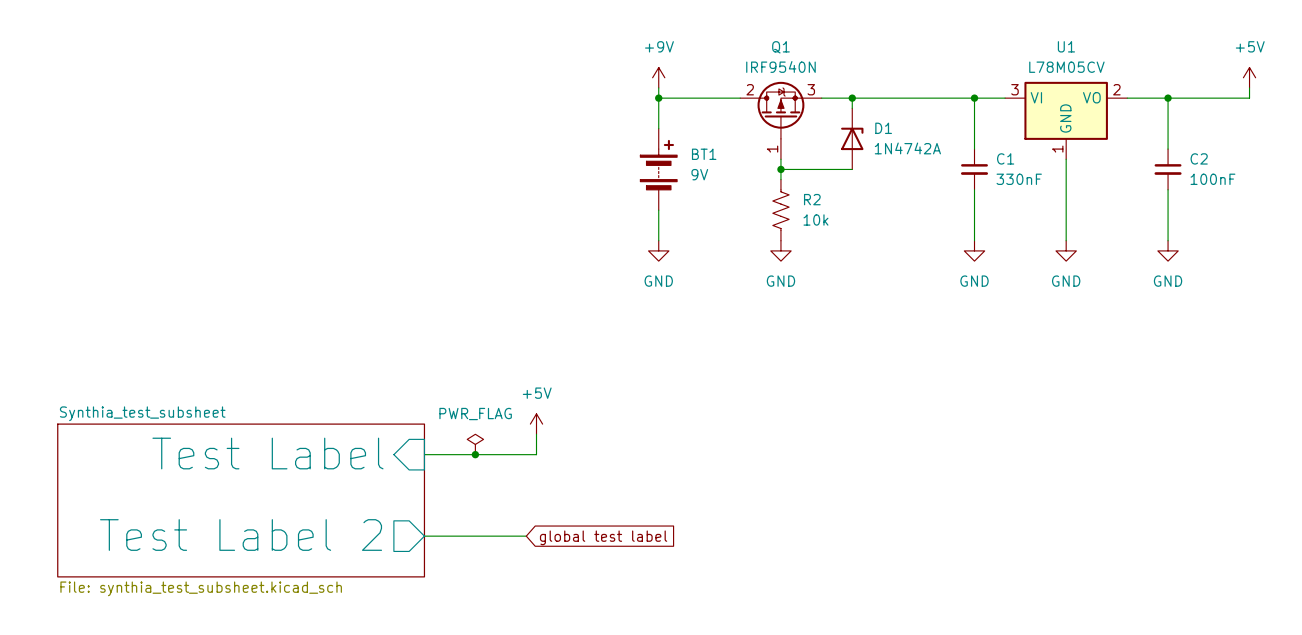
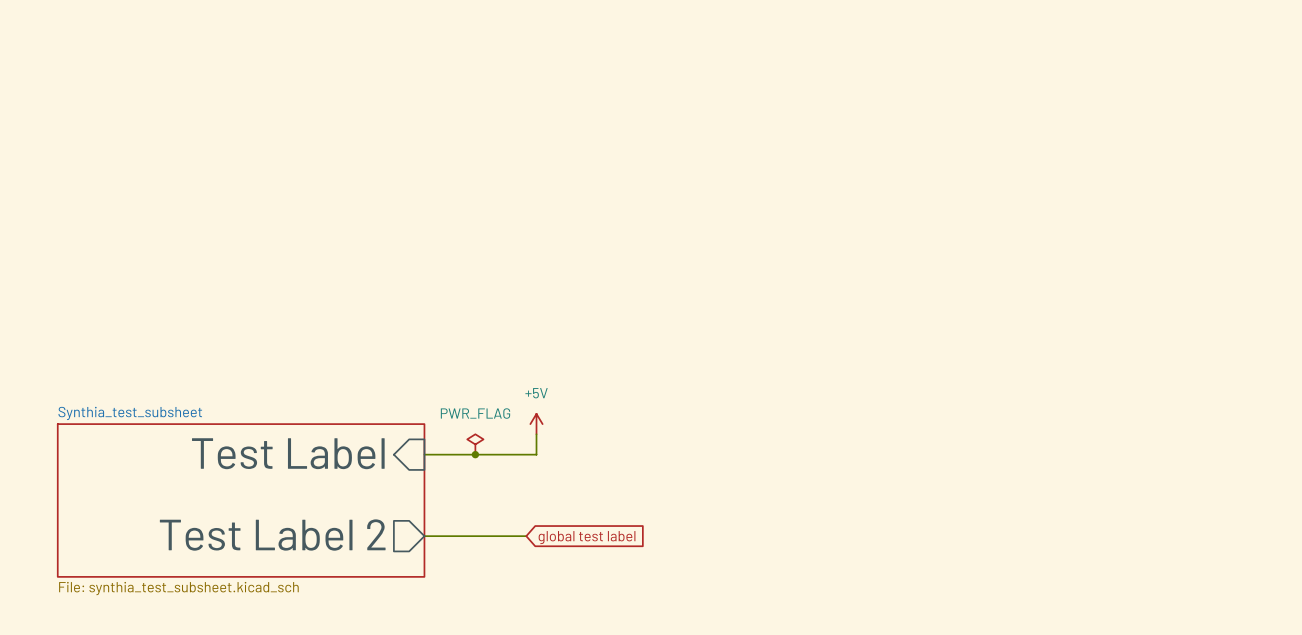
power symbol: +9V (658, 77) -> none
power symbol: +5V (1249, 77) -> none
wire: (658, 87) (658, 128) -> none
wire: (1249, 87) (1249, 98) (1127, 98) -> none
wire: (658, 98) (740, 98) -> none
junction: (658, 98) -> none
wire: (821, 98) (1005, 98) -> none
wire: (852, 98) (852, 108) -> none
junction: (852, 98) -> none
wire: (974, 98) (974, 149) -> none
junction: (974, 98) -> none
wire: (1168, 98) (1168, 149) -> none
junction: (1168, 98) -> none
Q1: IRF9540N (780, 120) -> none
U1: L78M05CV (1066, 120) -> none
D1: 1N4742A (852, 138) -> none
wire: (780, 159) (780, 179) -> none
wire: (1066, 159) (1066, 240) -> none
BT1: 9V (658, 169) -> none
wire: (780, 169) (852, 169) -> none
junction: (780, 169) -> none
C1: 330nF (974, 169) -> none
C2: 100nF (1168, 169) -> none
wire: (974, 189) (974, 240) -> none
wire: (1168, 189) (1168, 240) -> none
wire: (658, 210) (658, 240) -> none
R2: 10k (780, 210) -> none
power symbol: GND (658, 250) -> none
power symbol: GND (780, 250) -> none
power symbol: GND (974, 250) -> none
power symbol: GND (1066, 250) -> none
power symbol: GND (1168, 250) -> none

